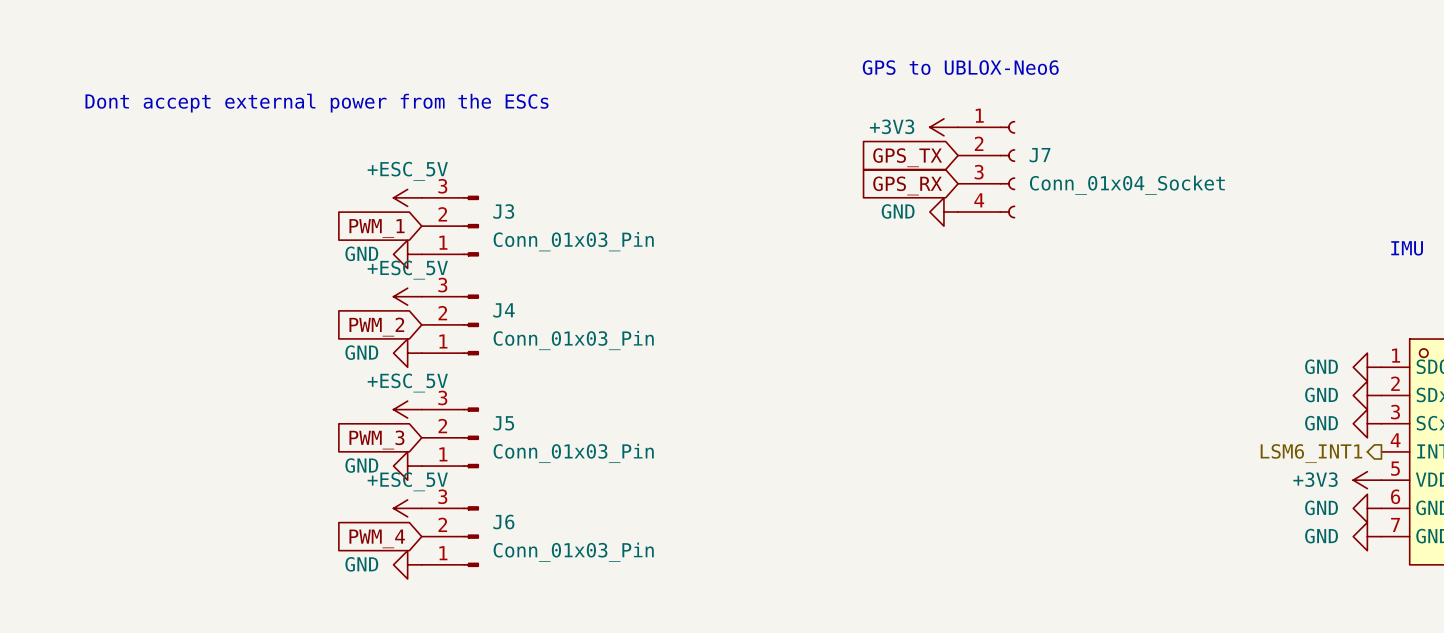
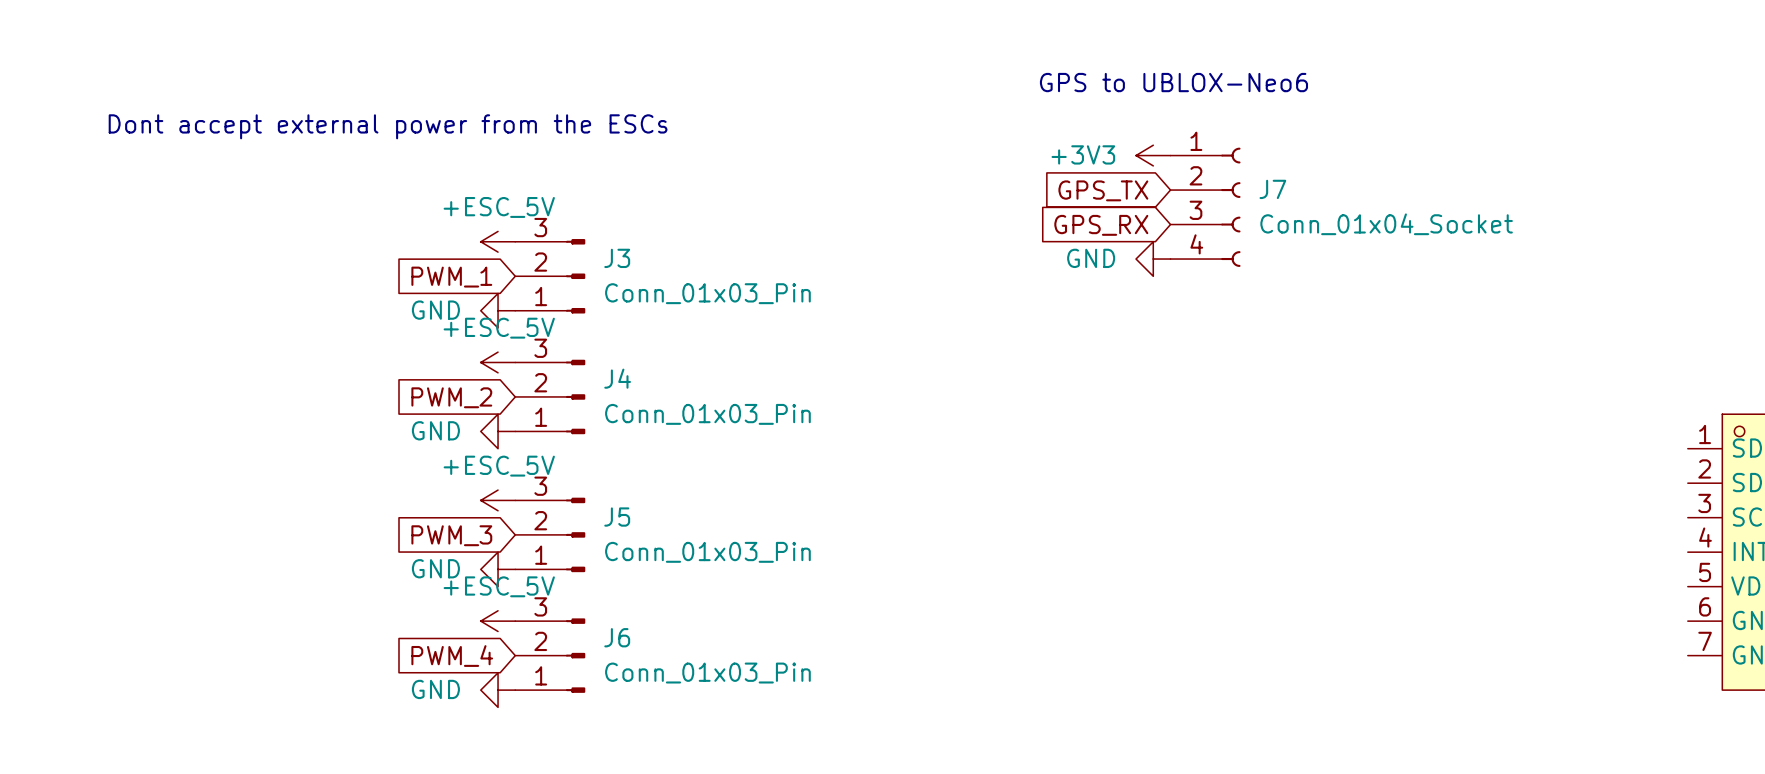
text: IMU (1407, 248) -> none
power symbol: GND (1367, 367) -> none
power symbol: GND (1367, 395) -> none
power symbol: GND (1367, 423) -> none
hierarchical label: LSM6_INT1 (1311, 453) -> none
power symbol: +3V3 (1367, 480) -> none
power symbol: GND (1367, 508) -> none
power symbol: GND (1367, 536) -> none

